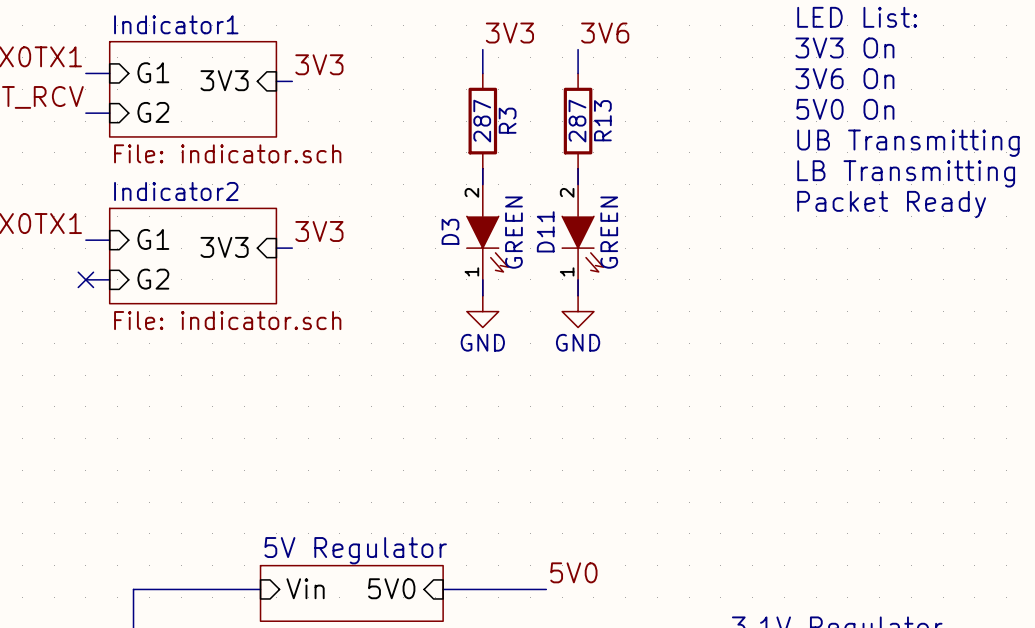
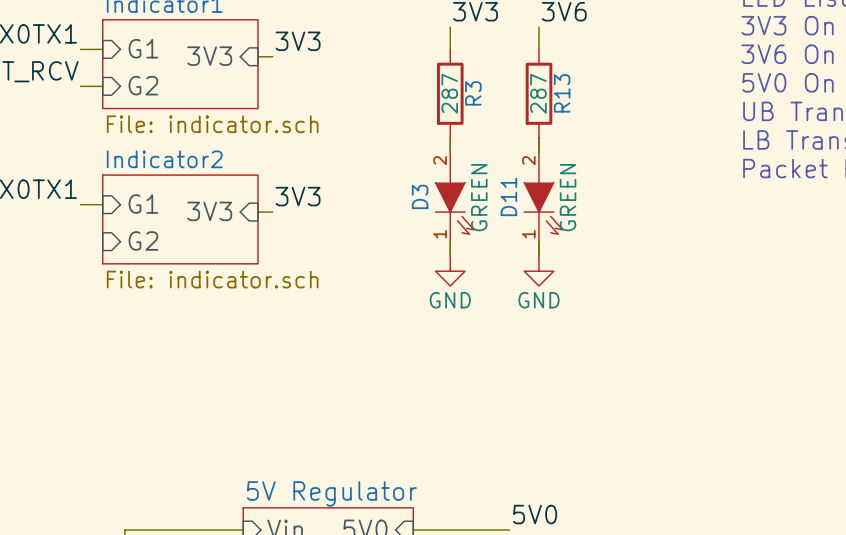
wire: (85, 279) (109, 279) -> none
no-connect mark: (85, 279) -> none

